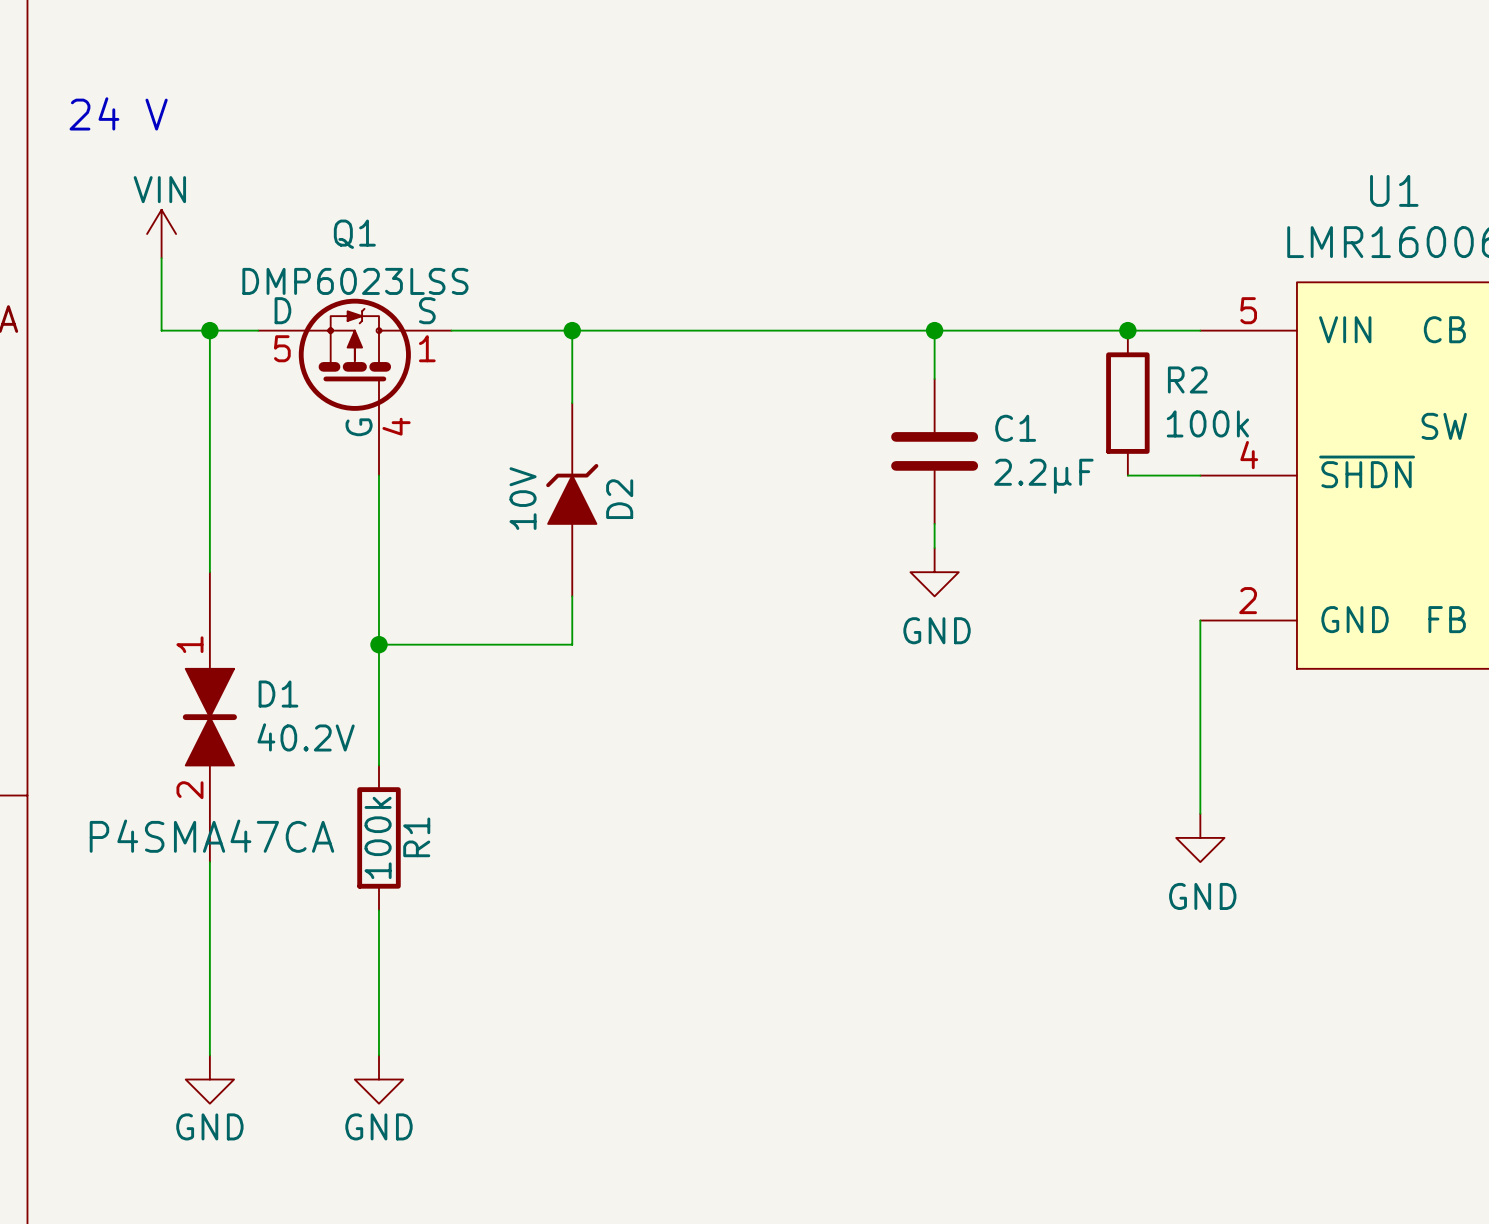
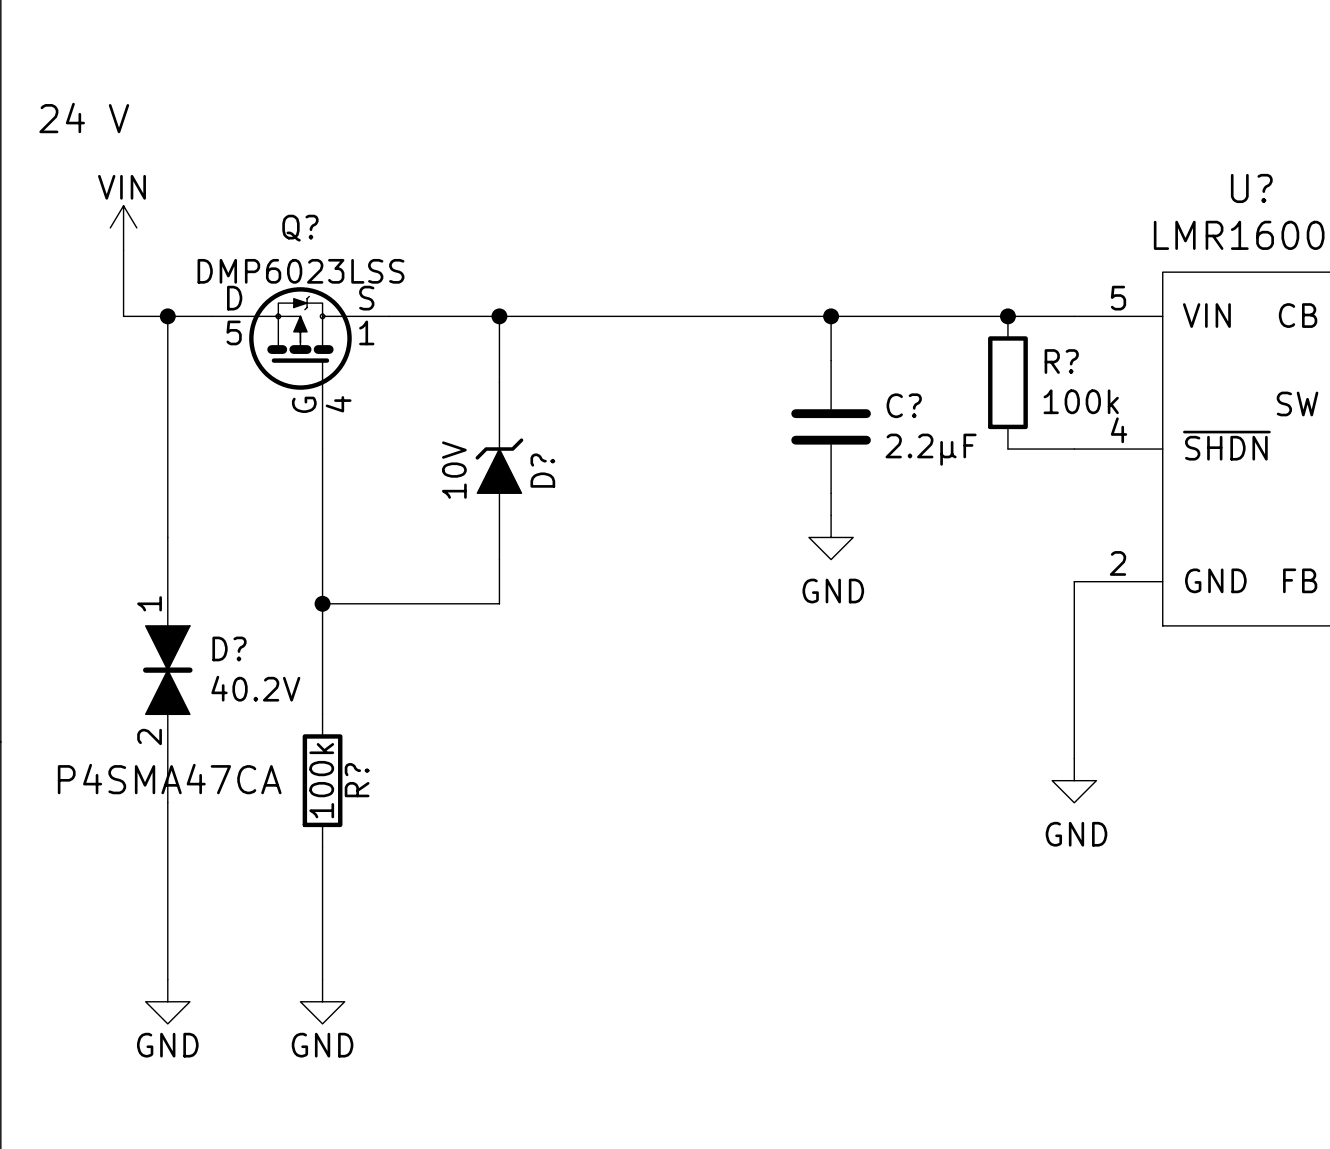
U1 name: U1 (1394, 190) -> U? (1251, 188)
Q1 name: Q1 (354, 234) -> Q? (300, 228)
R2 name: R2 (1187, 379) -> R? (1061, 361)
C1 name: C1 (1015, 428) -> C? (904, 405)
D2 name: D2 (619, 499) -> D? (542, 470)
D1 name: D1 (278, 694) -> D? (229, 648)
R1 name: R1 (416, 837) -> R? (357, 780)

